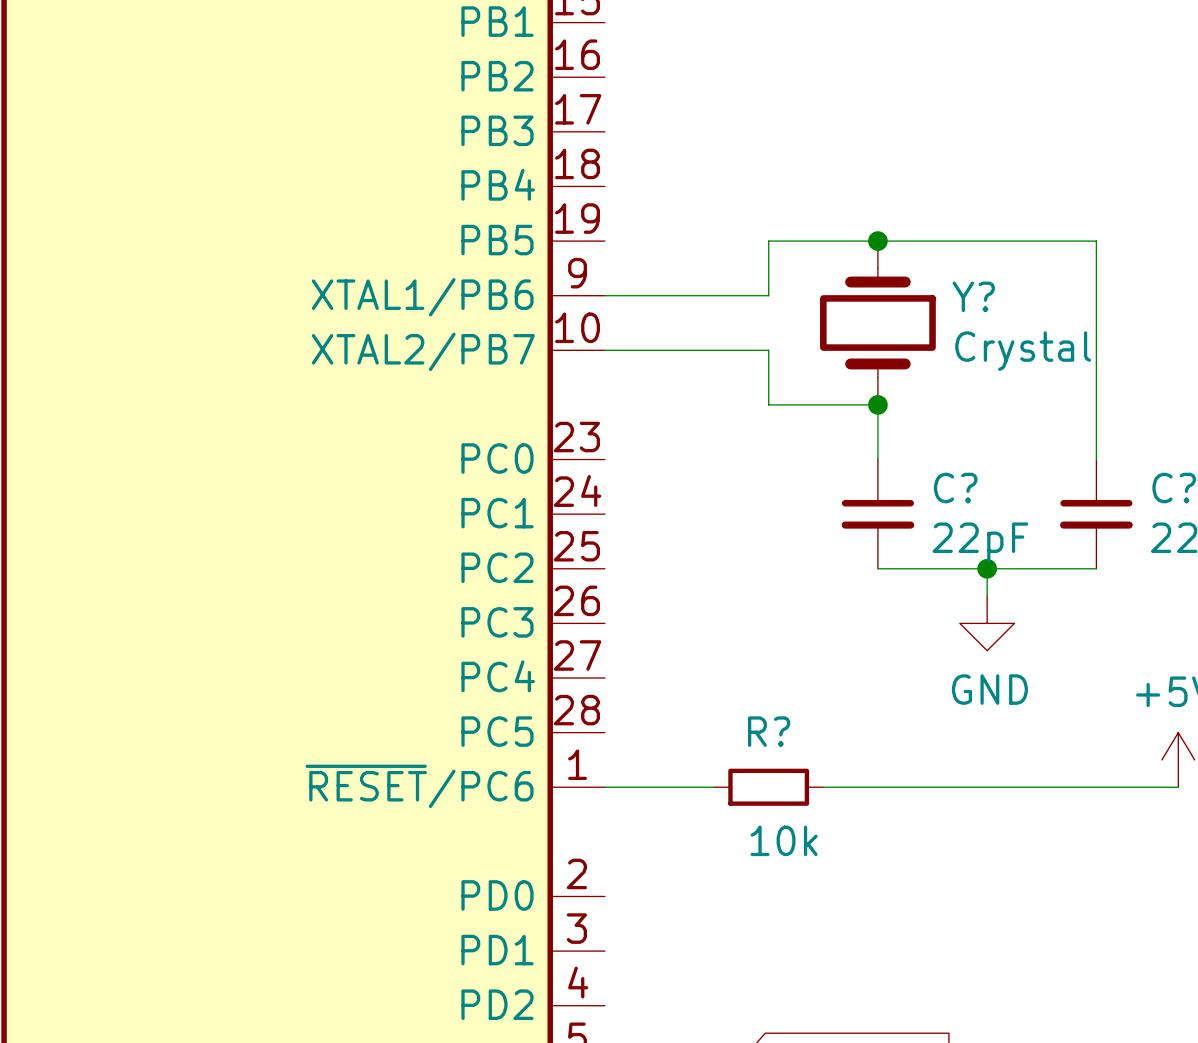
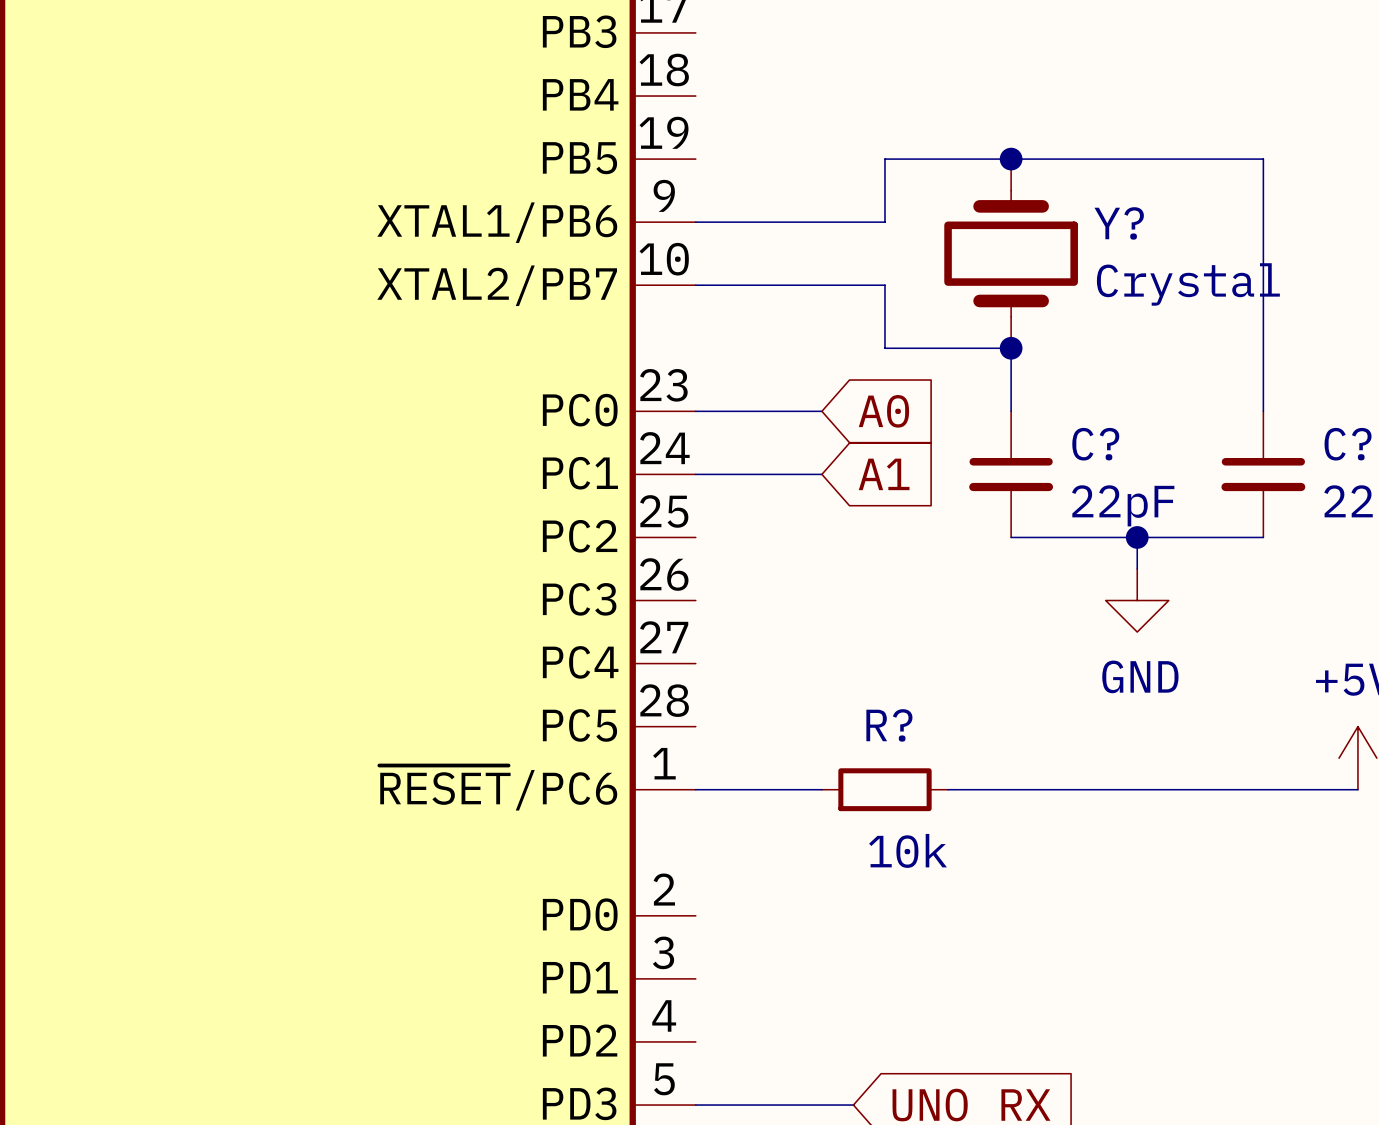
wire: none -> (695, 411) (821, 411)
global label: none -> A0 (883, 411)
wire: none -> (695, 474) (821, 474)
global label: none -> A1 (884, 474)

